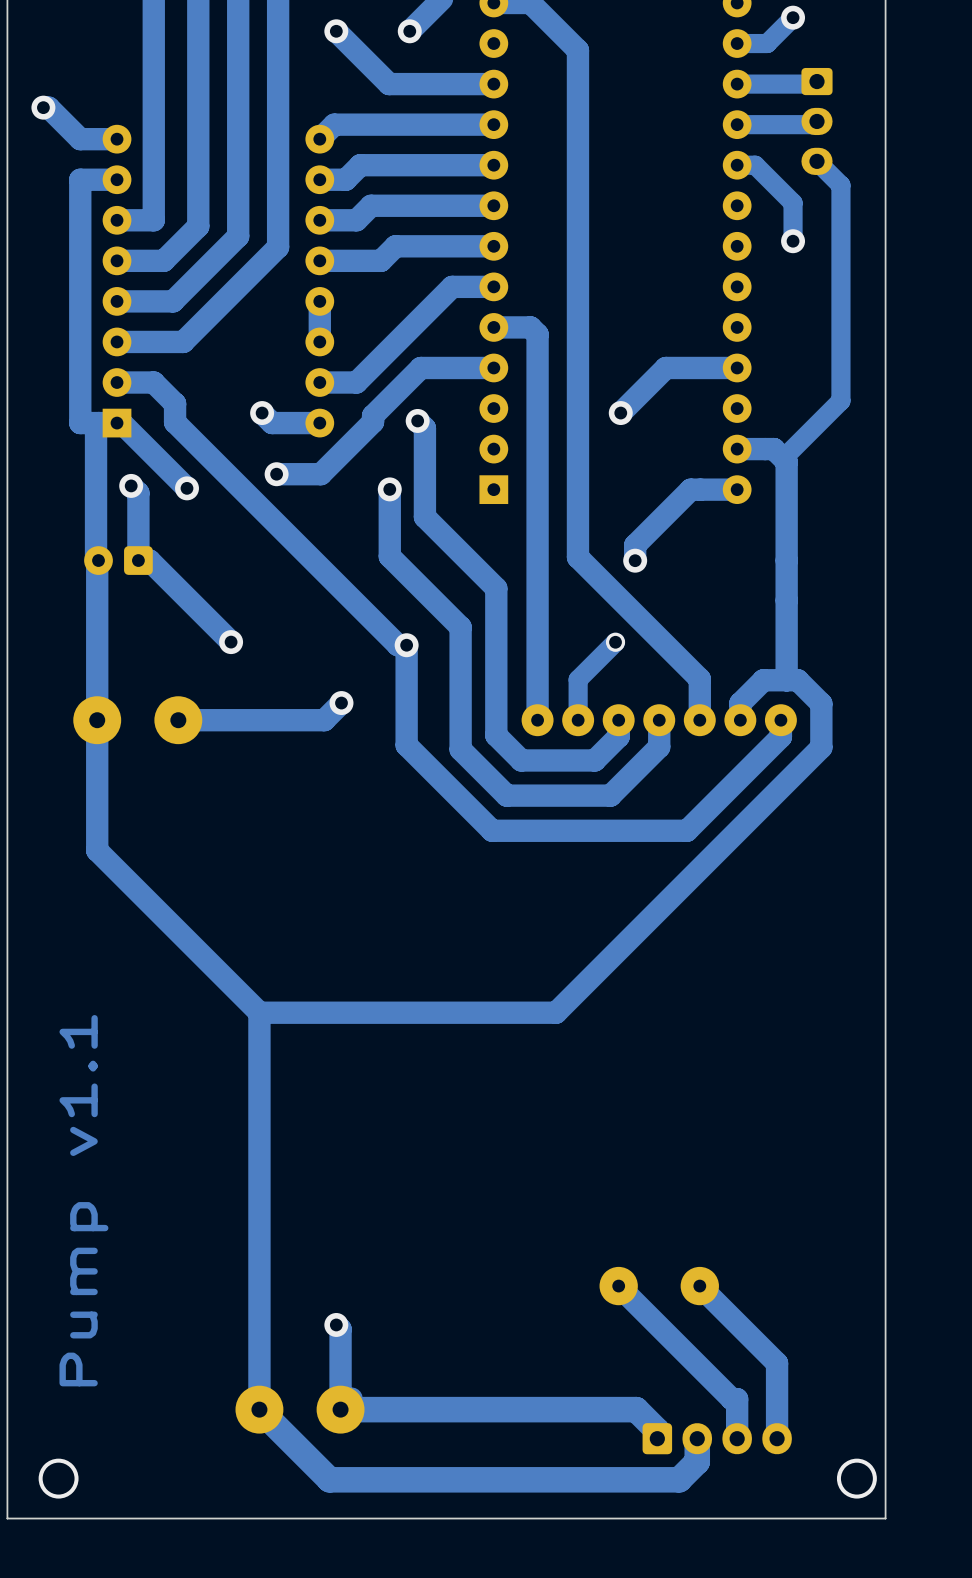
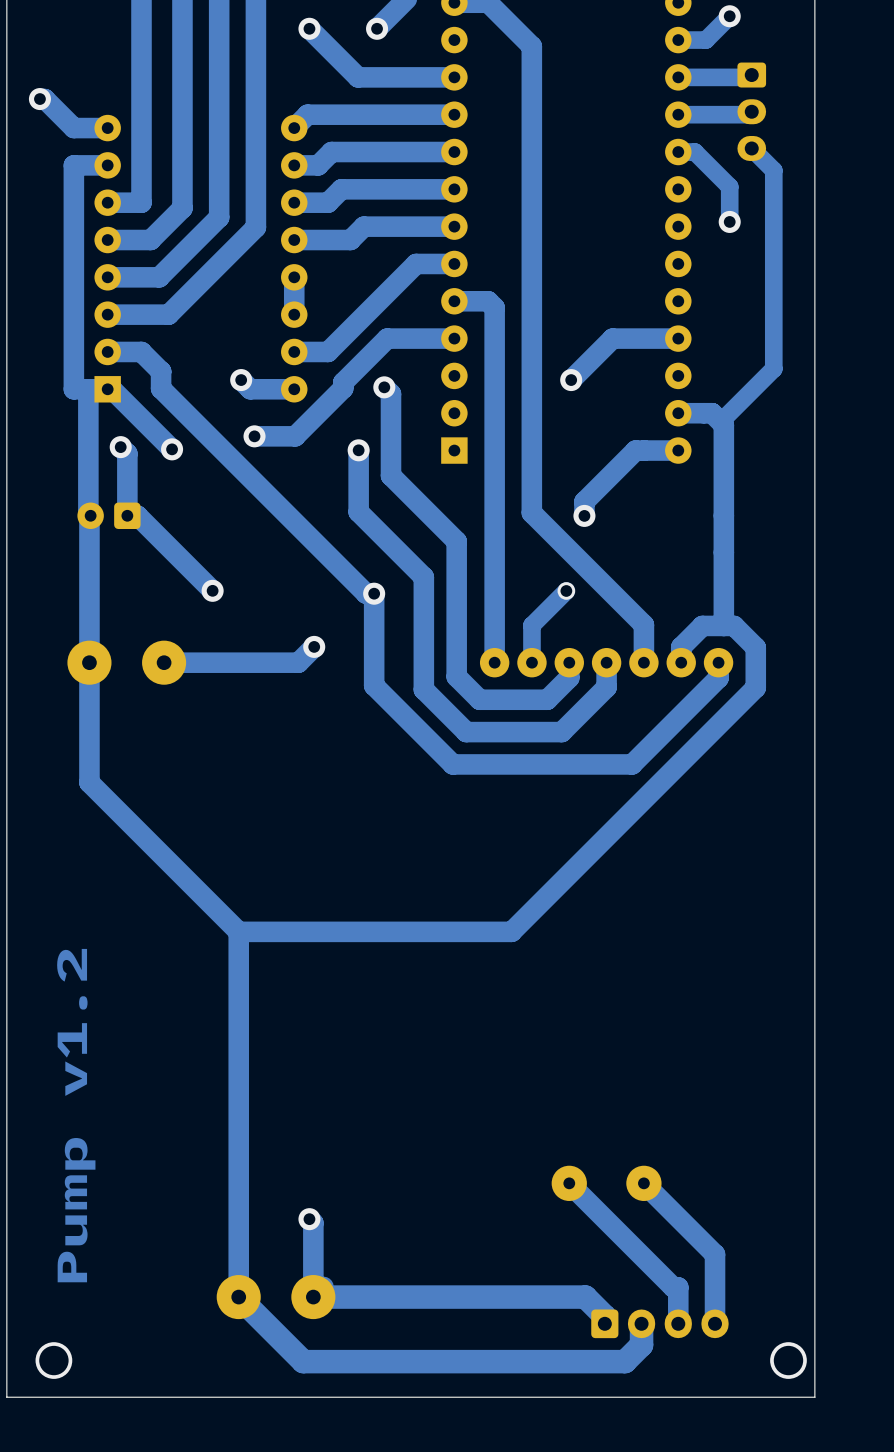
text: Pump v1.1 (83, 1200) -> Pump v1.2 (76, 1115)

